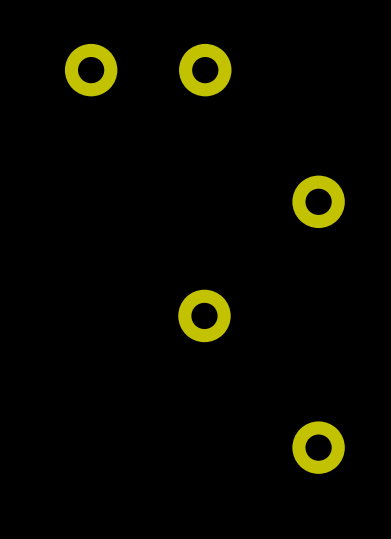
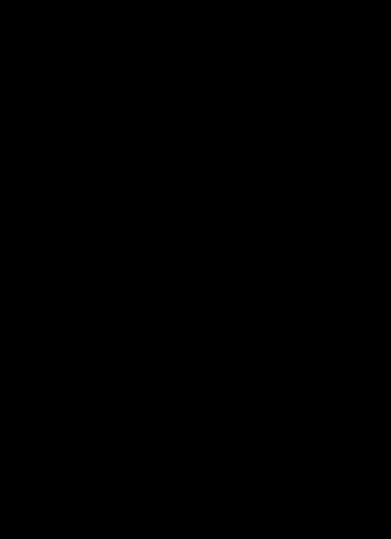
part: (91, 70) -> none
part: (205, 70) -> none
part: (318, 201) -> none
part: (204, 315) -> none
part: (318, 447) -> none

